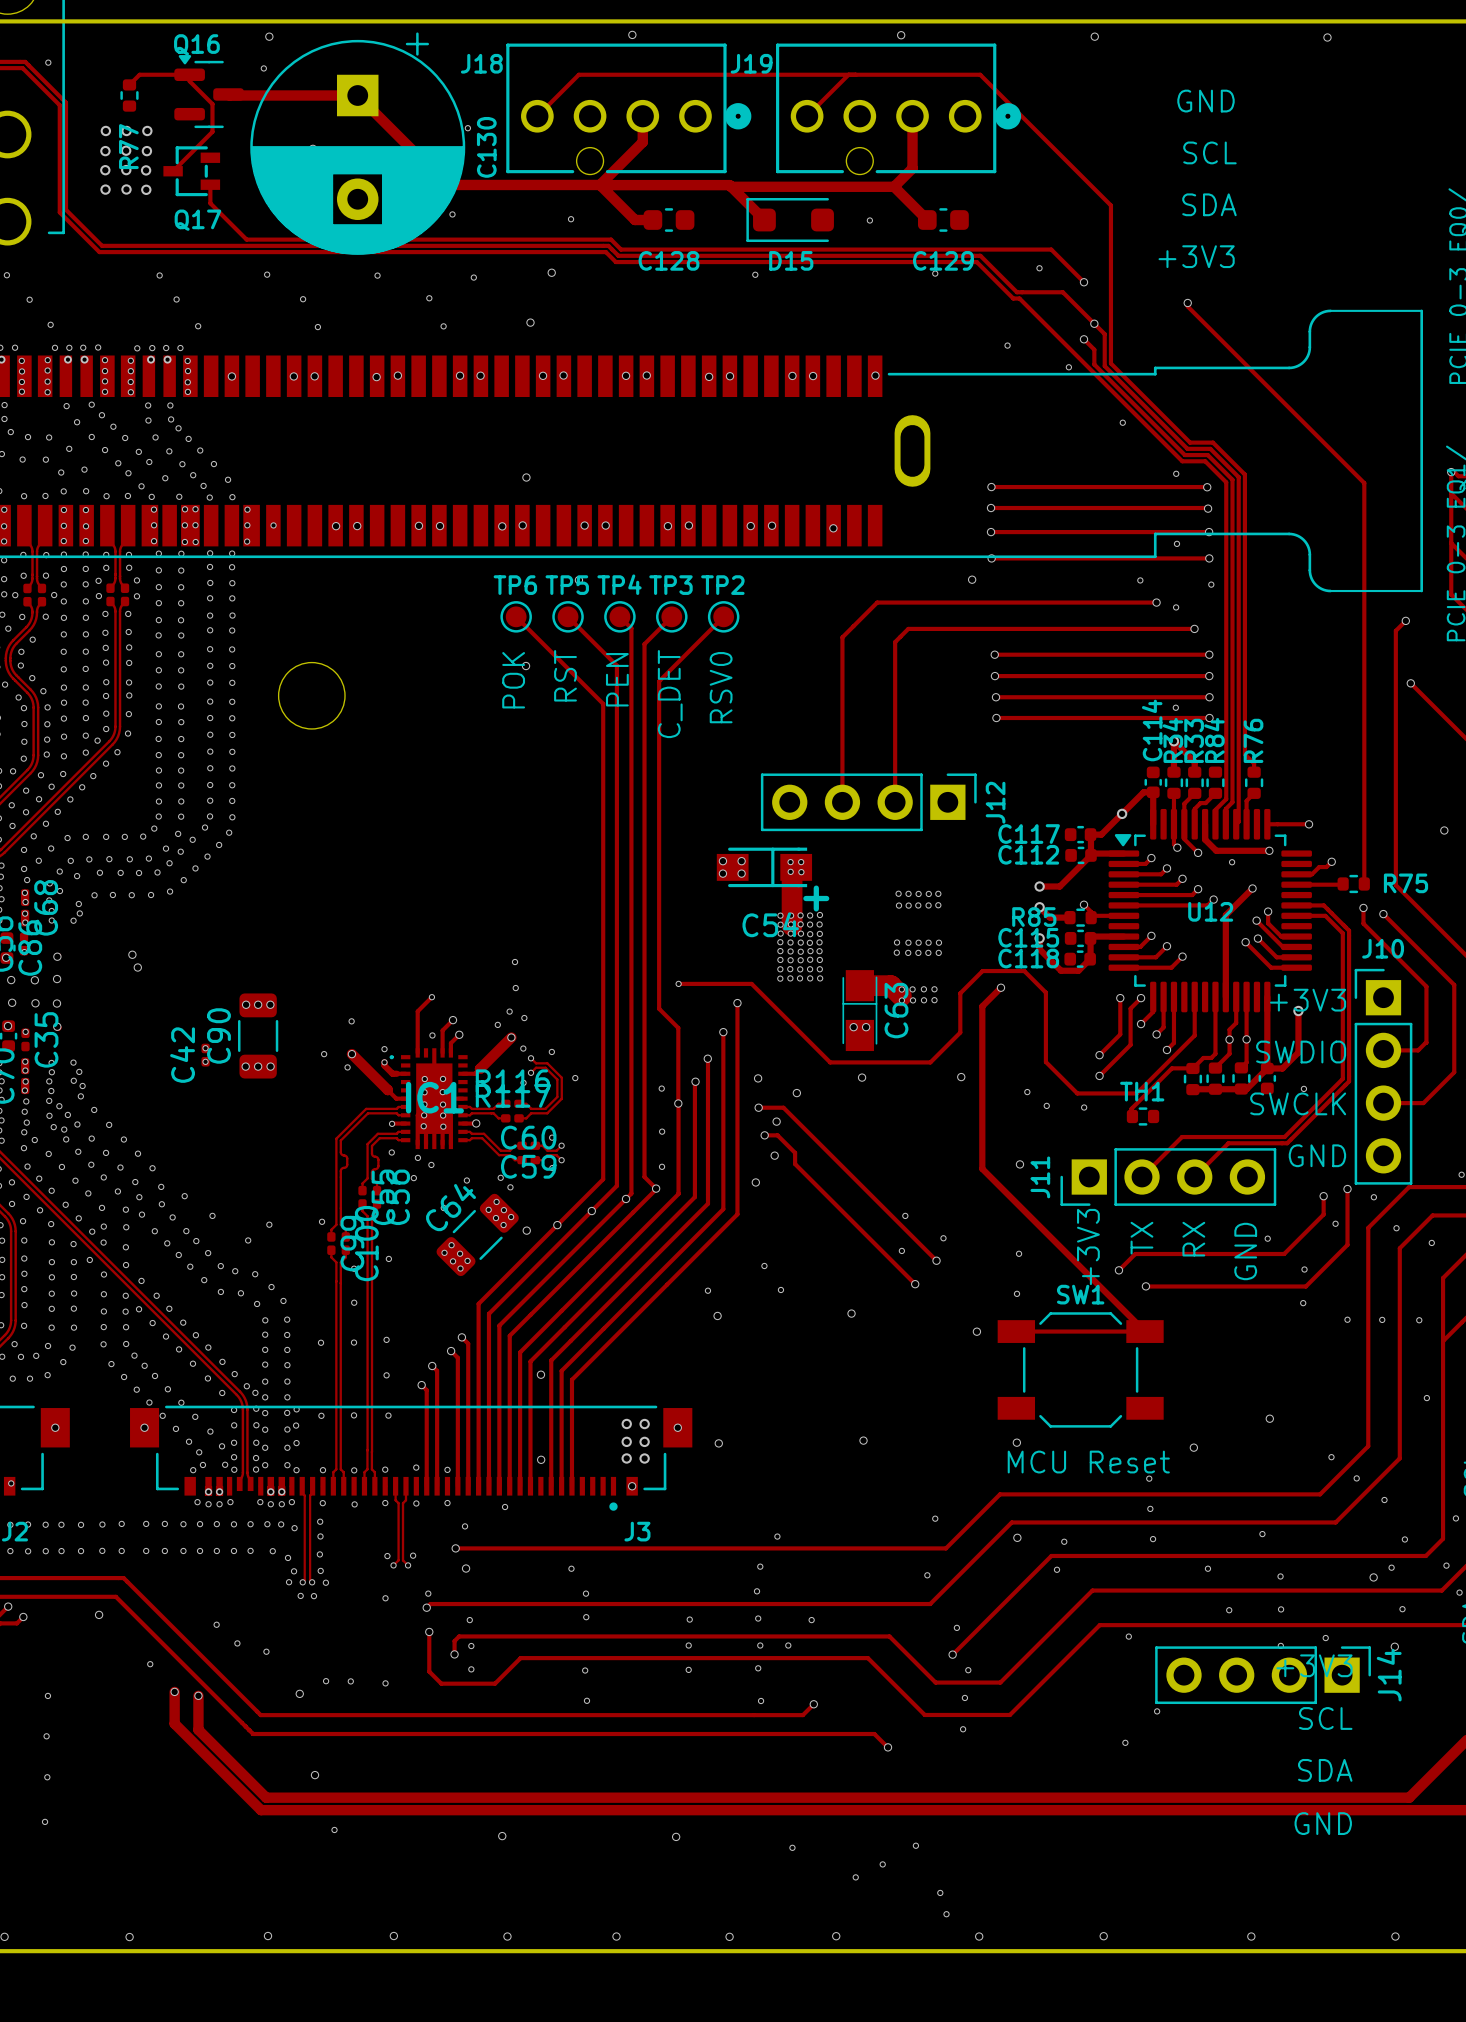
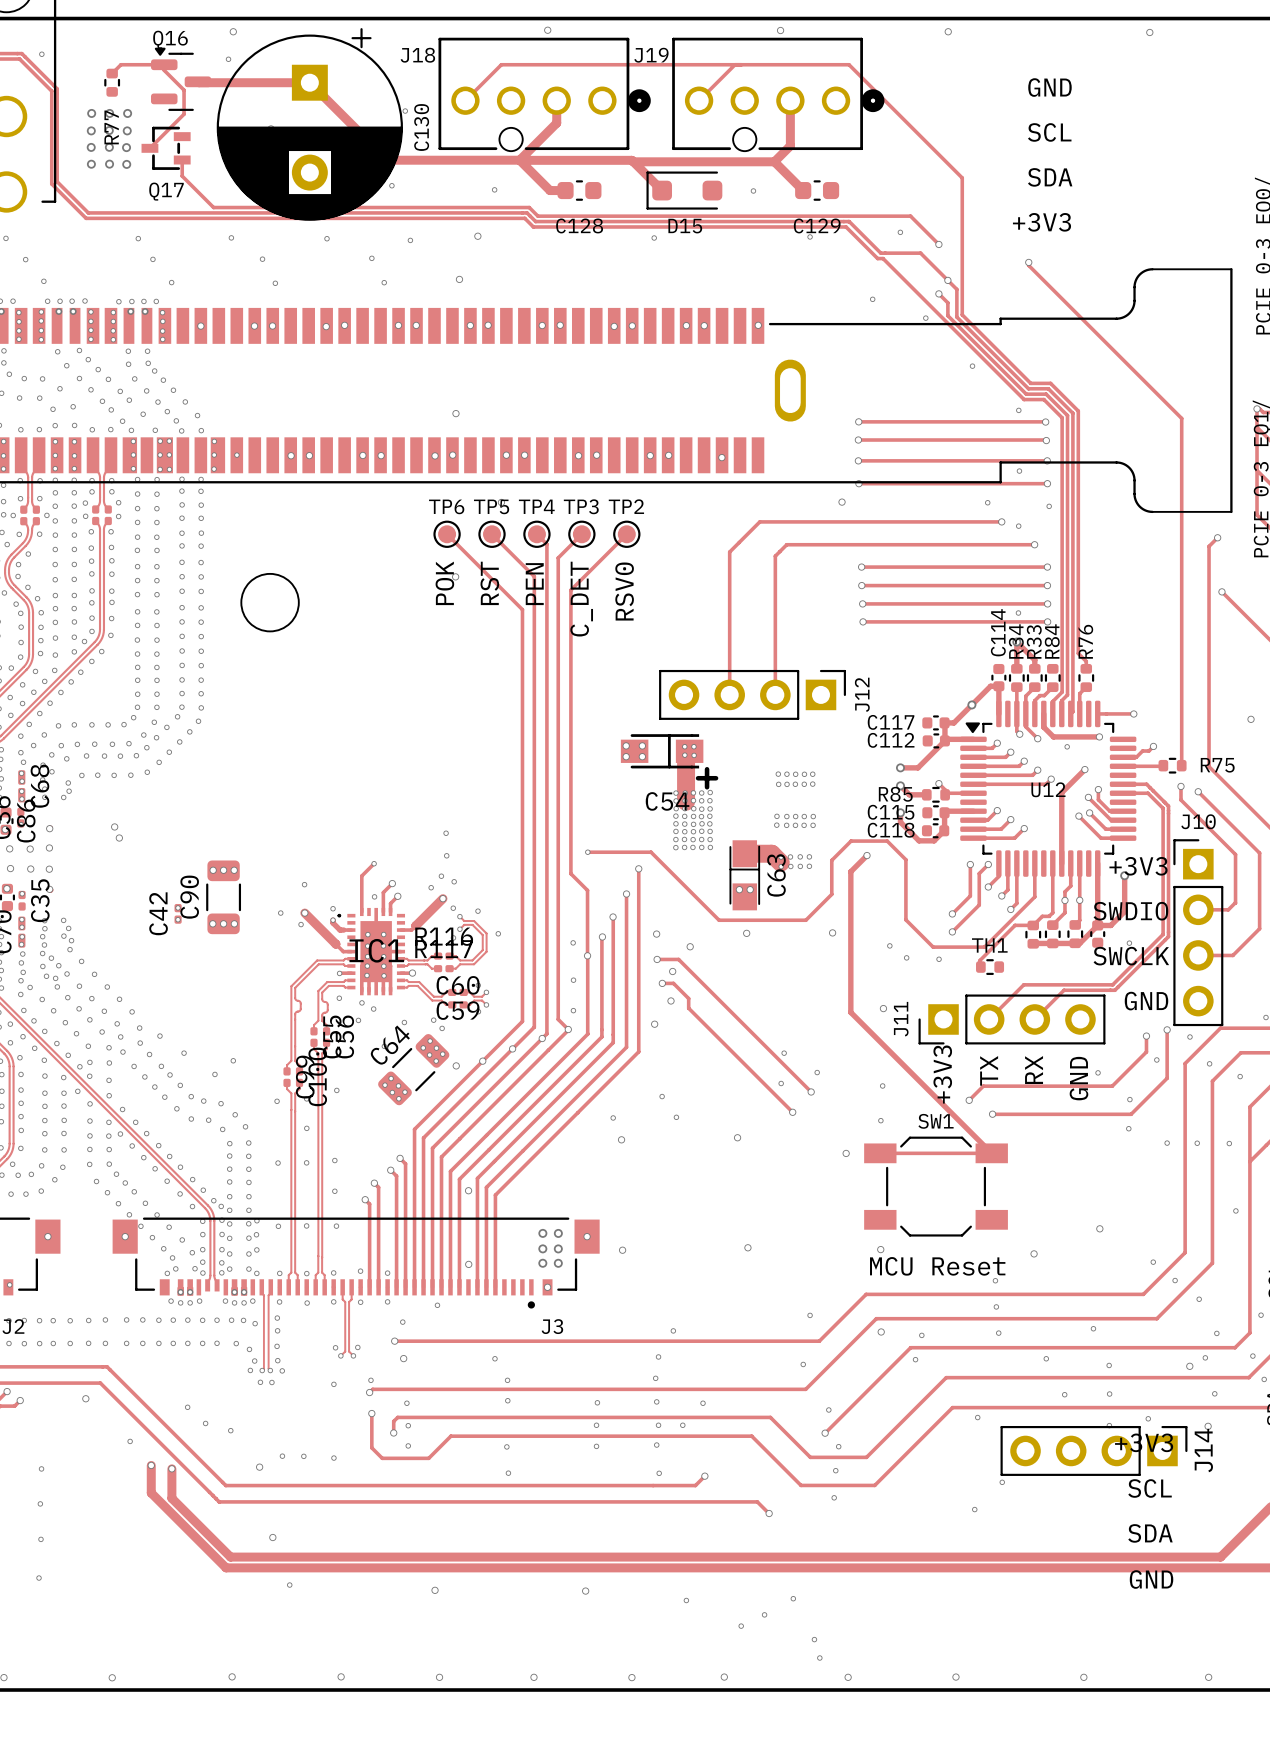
via position: (322, 1221) -> (277, 1101)

